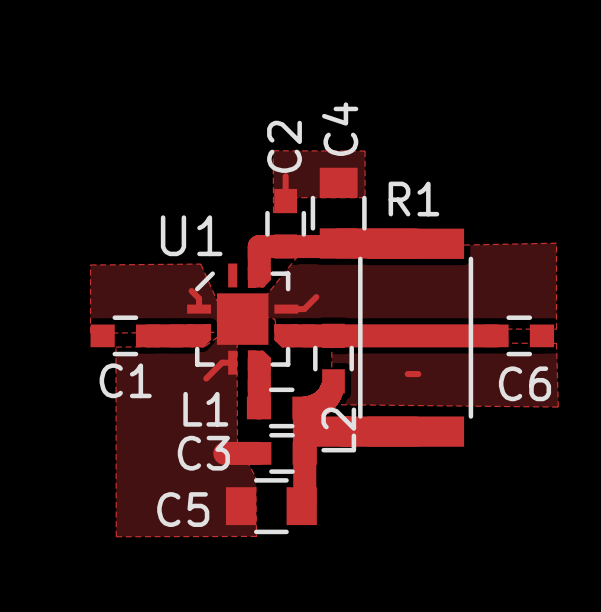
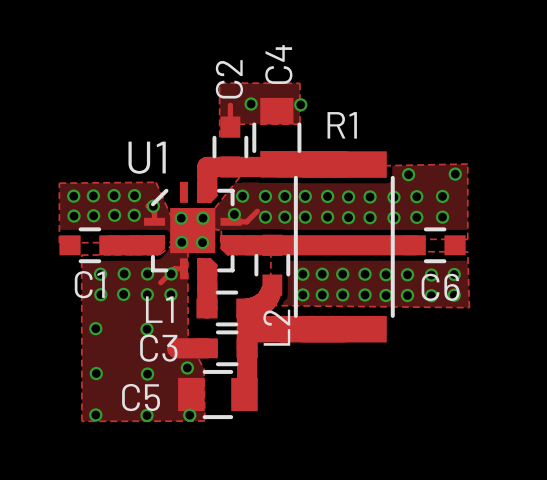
part: none -> (251, 104)
part: none -> (300, 104)
part: none -> (455, 174)
part: none -> (408, 174)
part: none -> (73, 196)
part: none -> (93, 195)
part: none -> (114, 195)
part: none -> (134, 195)
part: none -> (242, 196)
part: none -> (265, 196)
part: none -> (284, 196)
part: none -> (305, 196)
part: none -> (327, 196)
part: none -> (348, 196)
part: none -> (370, 196)
part: none -> (416, 196)
part: none -> (442, 196)
part: none -> (393, 197)
part: none -> (153, 206)
part: none -> (234, 214)
part: none -> (114, 215)
part: none -> (134, 215)
part: none -> (73, 216)
part: none -> (93, 215)
part: none -> (265, 217)
part: none -> (284, 217)
part: none -> (305, 217)
part: none -> (327, 217)
part: none -> (442, 217)
part: none -> (181, 218)
part: none -> (203, 218)
part: none -> (348, 217)
part: none -> (370, 217)
part: none -> (393, 217)
part: none -> (416, 217)
part: none -> (181, 242)
part: none -> (202, 242)
part: none -> (100, 274)
part: none -> (124, 273)
part: none -> (147, 273)
part: none -> (171, 273)
part: none -> (302, 274)
part: none -> (322, 274)
part: none -> (342, 274)
part: none -> (365, 274)
part: none -> (386, 274)
part: none -> (407, 274)
part: none -> (431, 275)
part: none -> (454, 274)
top track: (407, 374) (418, 374) -> none
part: none -> (123, 294)
part: none -> (100, 294)
part: none -> (147, 294)
part: none -> (170, 294)
part: none -> (302, 294)
part: none -> (322, 294)
part: none -> (342, 294)
part: none -> (365, 294)
part: none -> (454, 295)
part: none -> (386, 295)
part: none -> (407, 295)
part: none -> (431, 295)
part: none -> (95, 328)
part: none -> (147, 329)
part: none -> (187, 367)
part: none -> (96, 373)
part: none -> (147, 374)
part: none -> (95, 414)
part: none -> (189, 415)
part: none -> (147, 415)

